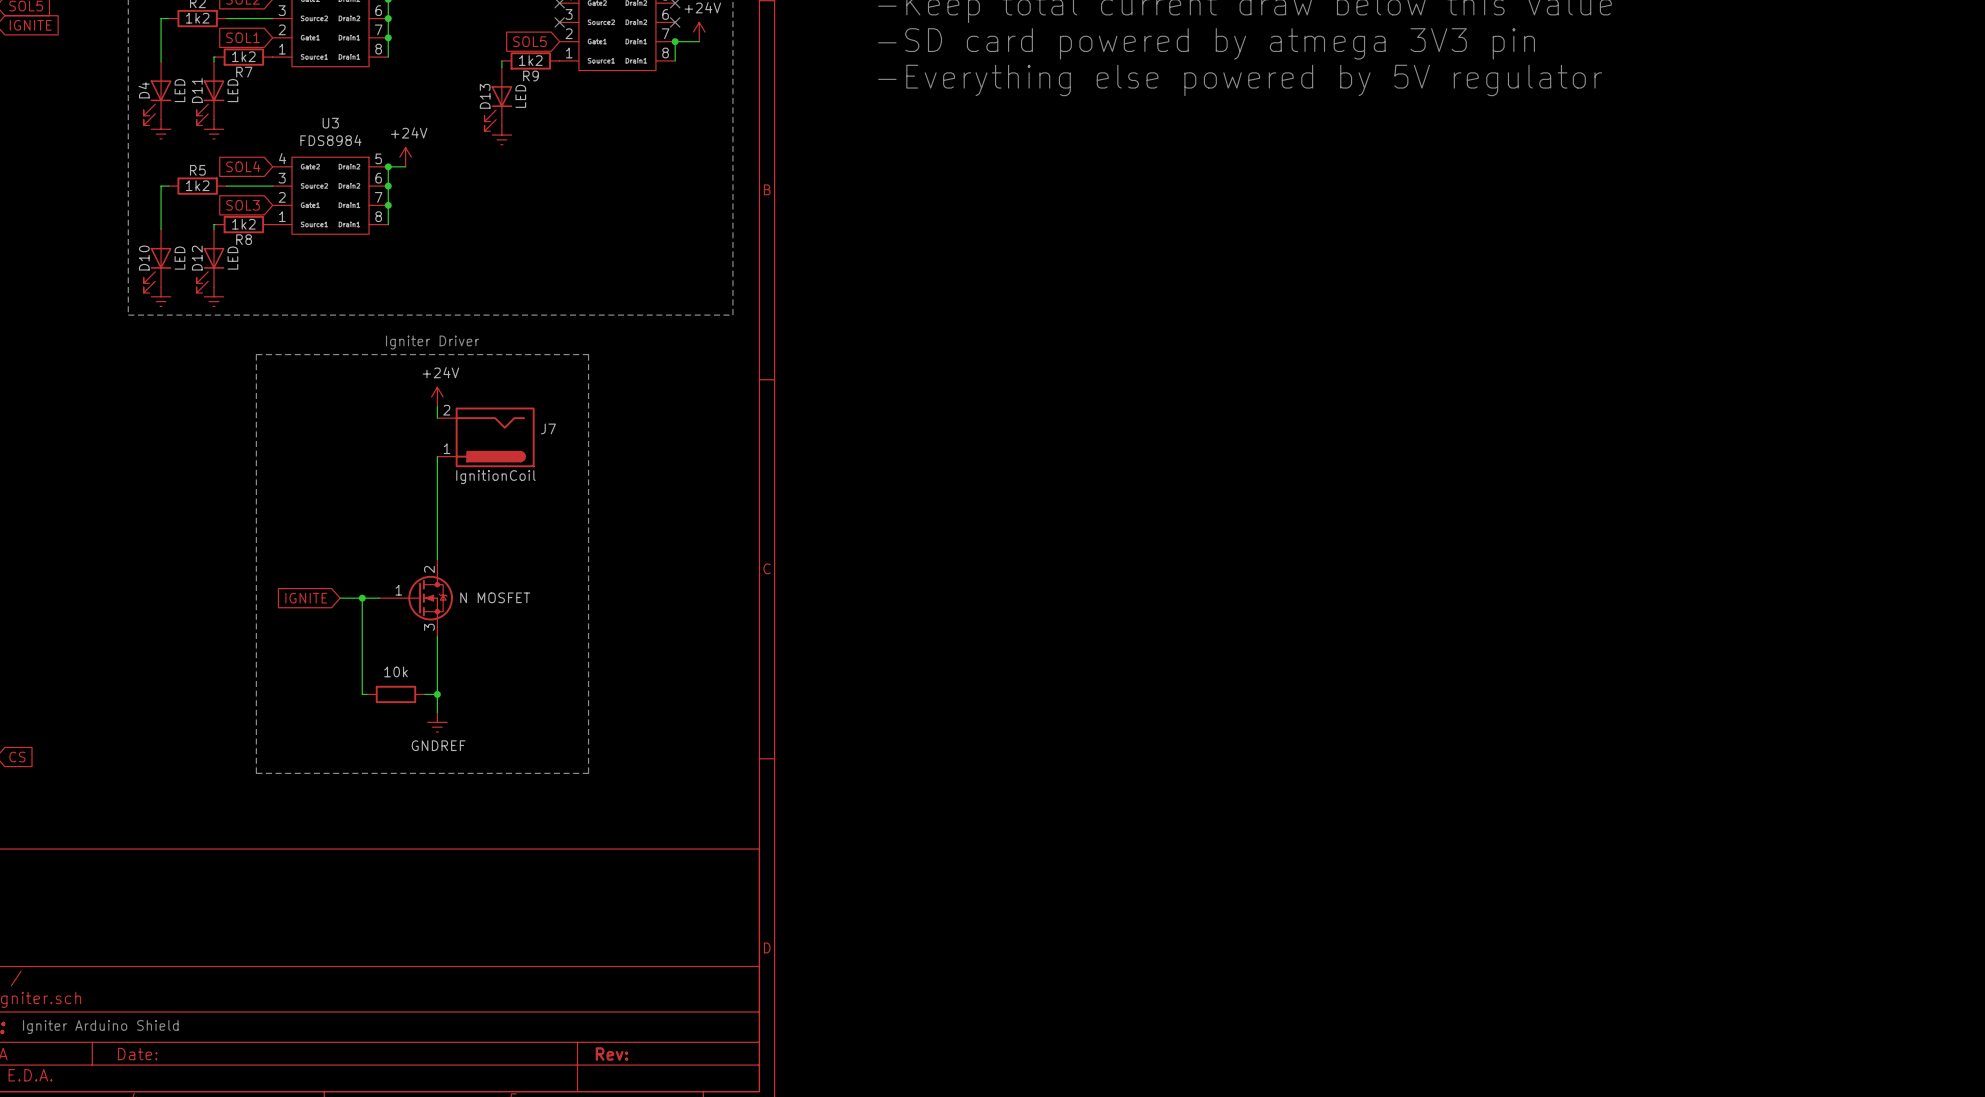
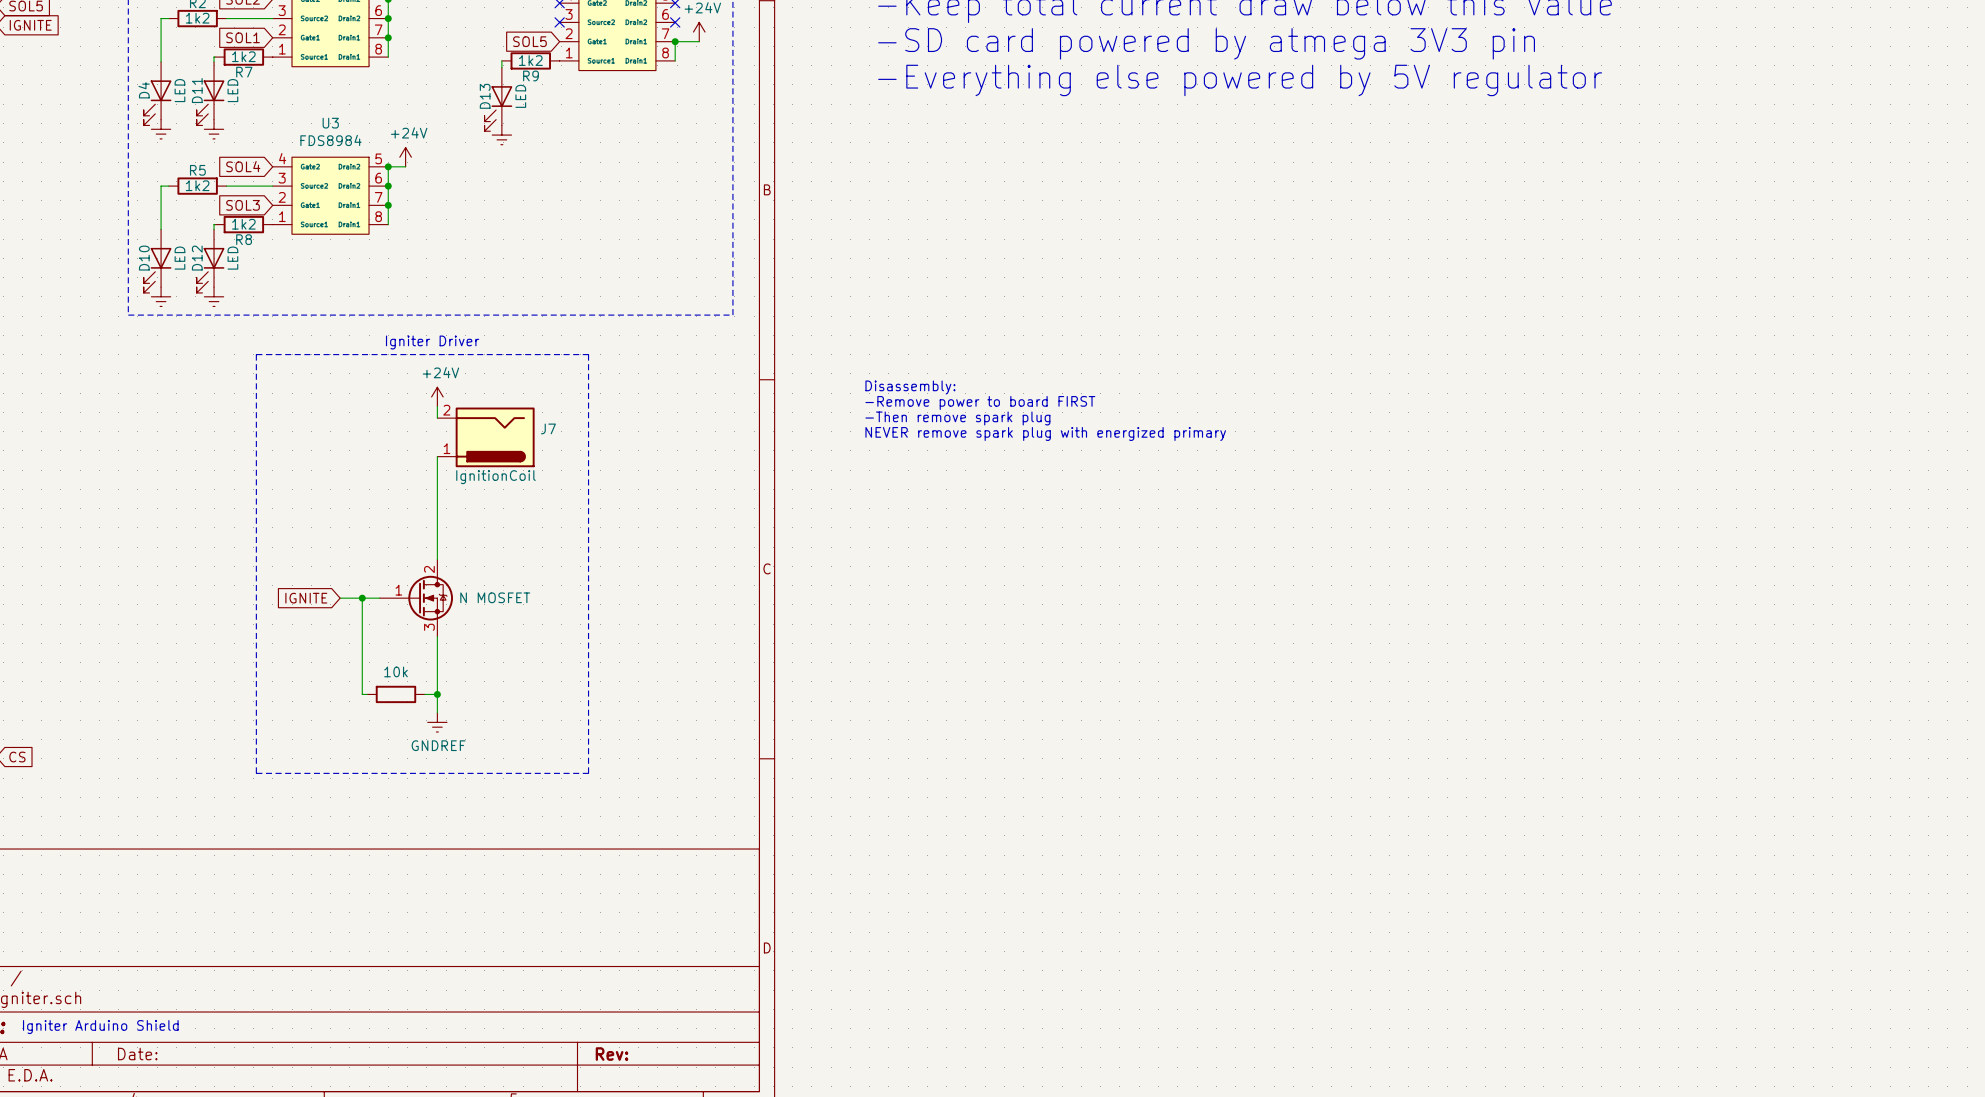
text: none -> Disassembly: (910, 387)
text: none -> -Remove power to board FIRST (980, 402)
text: none -> -Then remove spark plug (957, 418)
text: none -> NEVER remove spark plug with energized primary (1045, 433)

